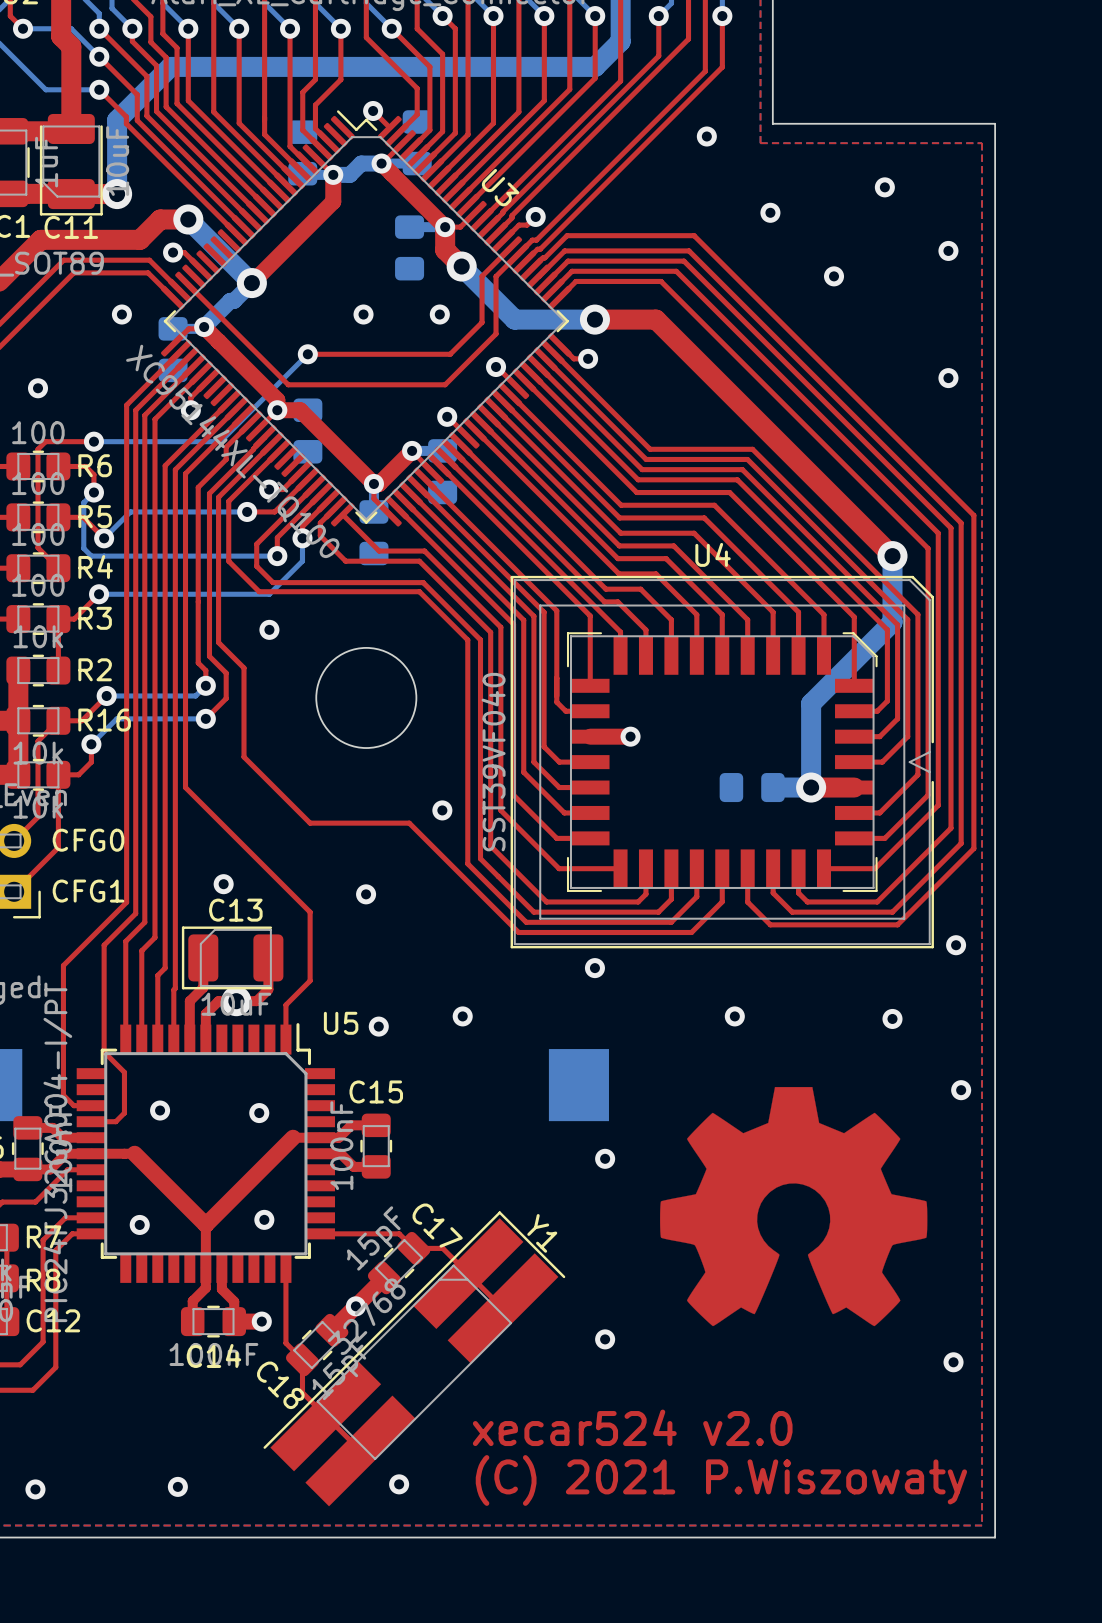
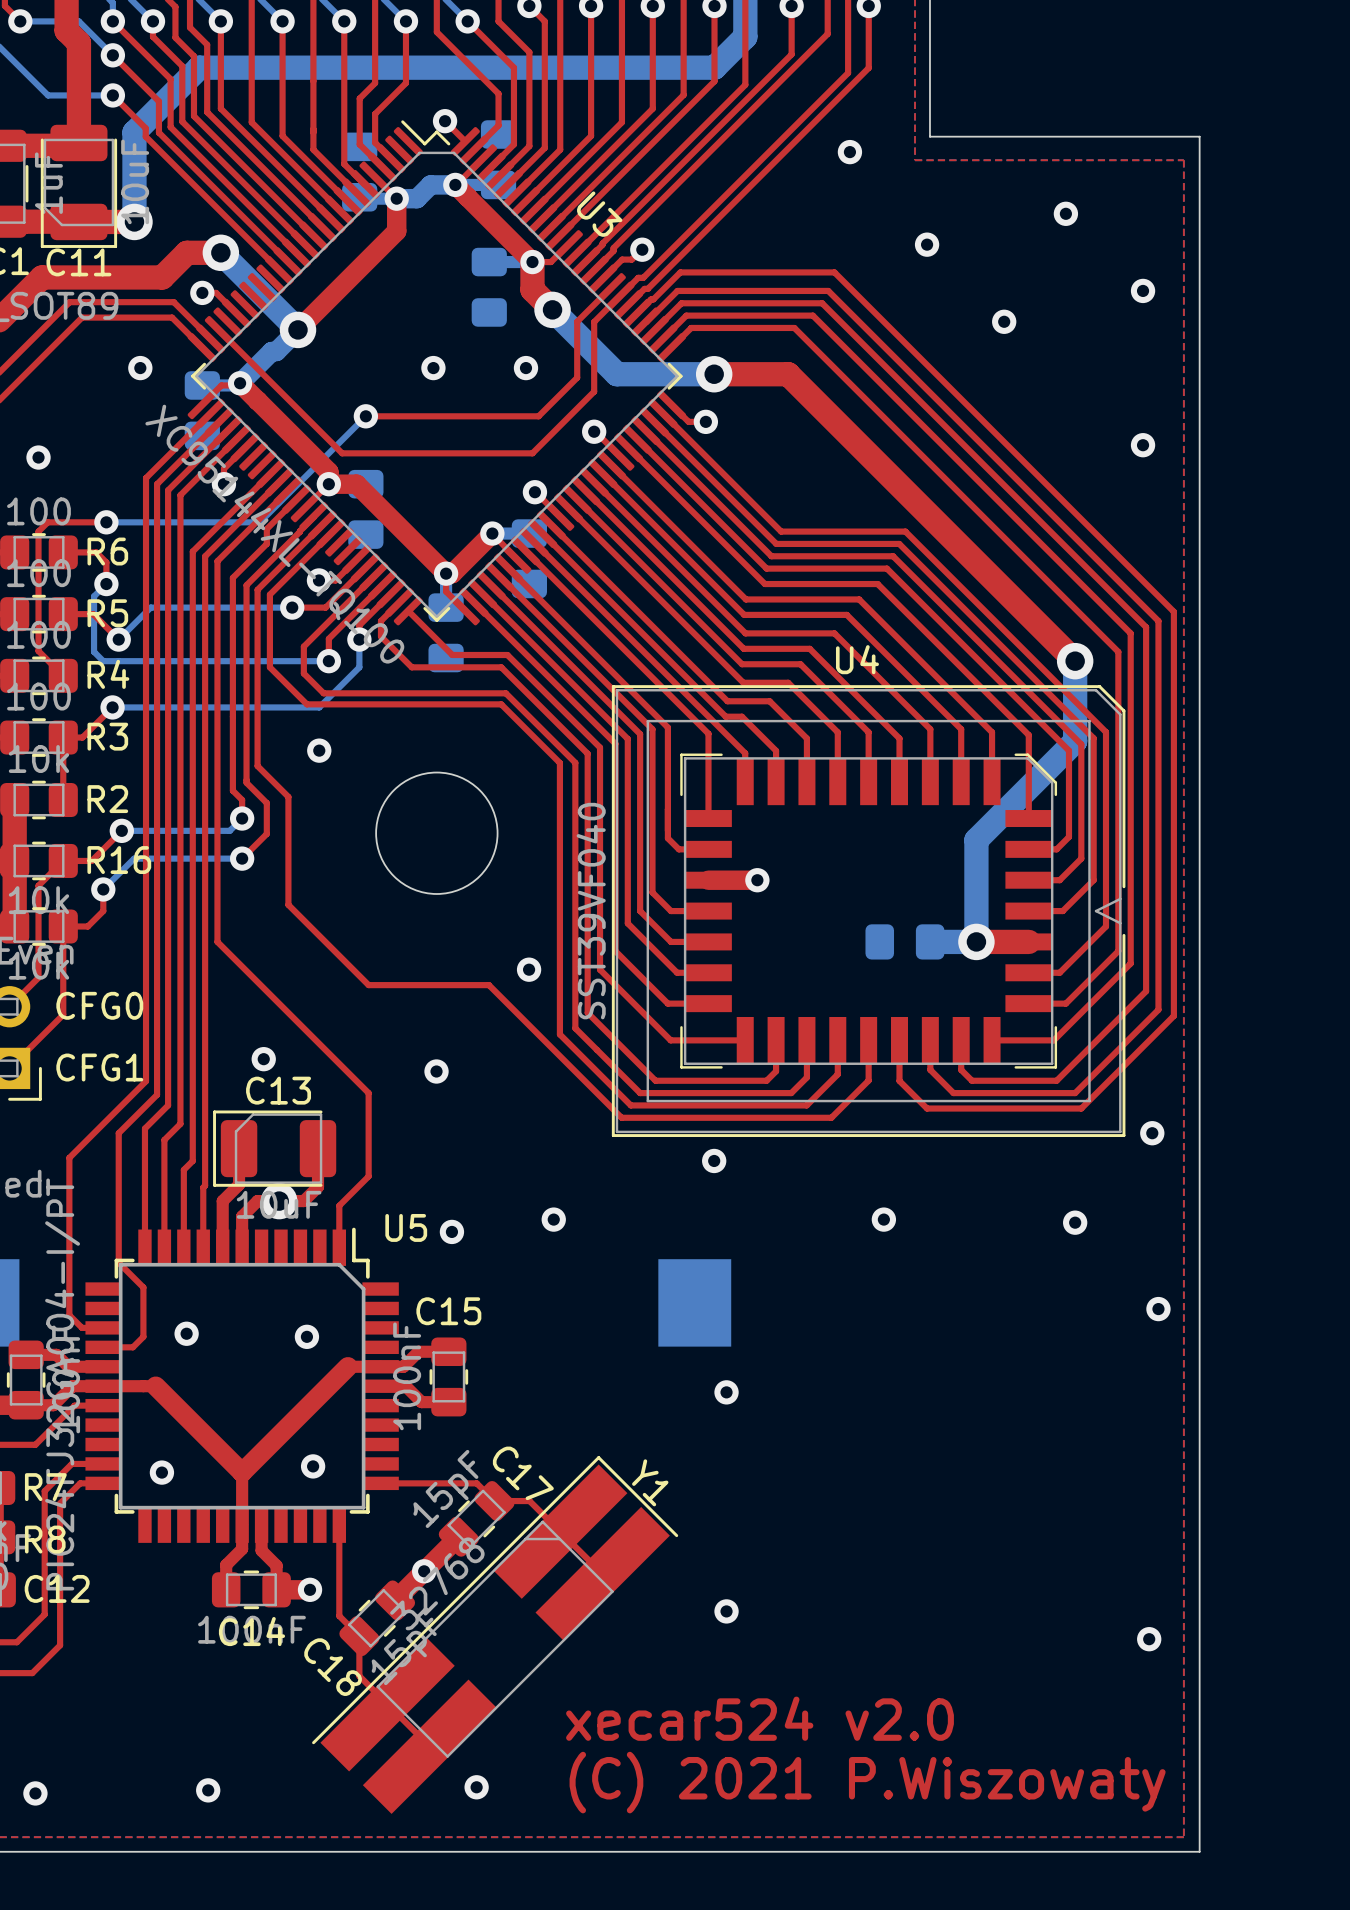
drawing: [660, 1087, 928, 1327] -> none

